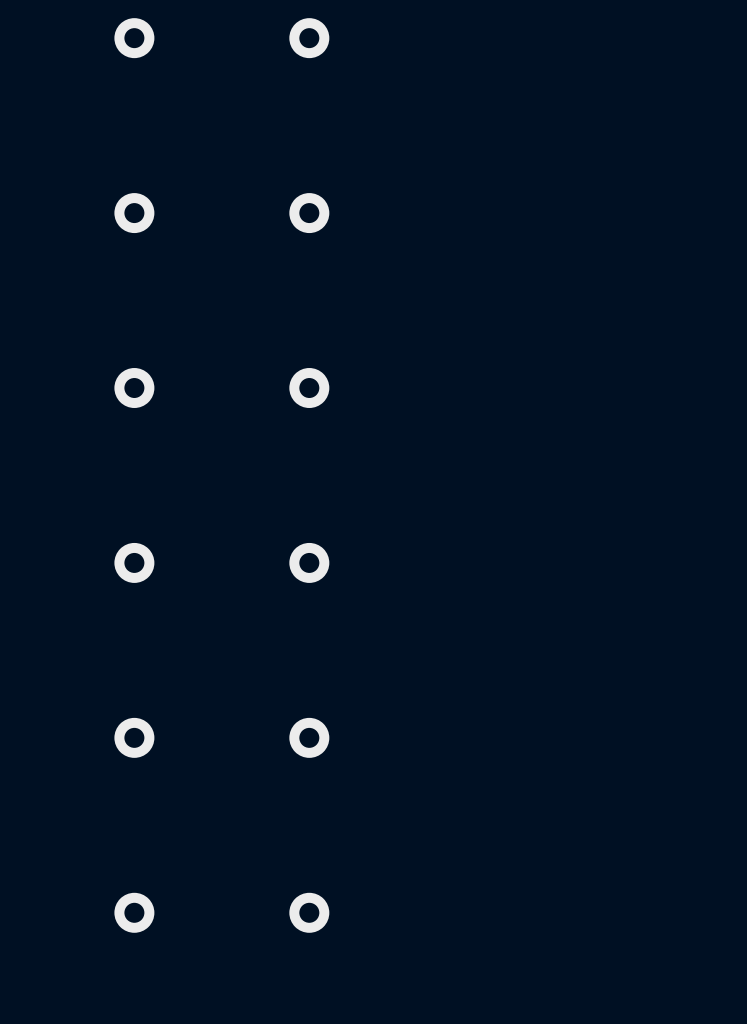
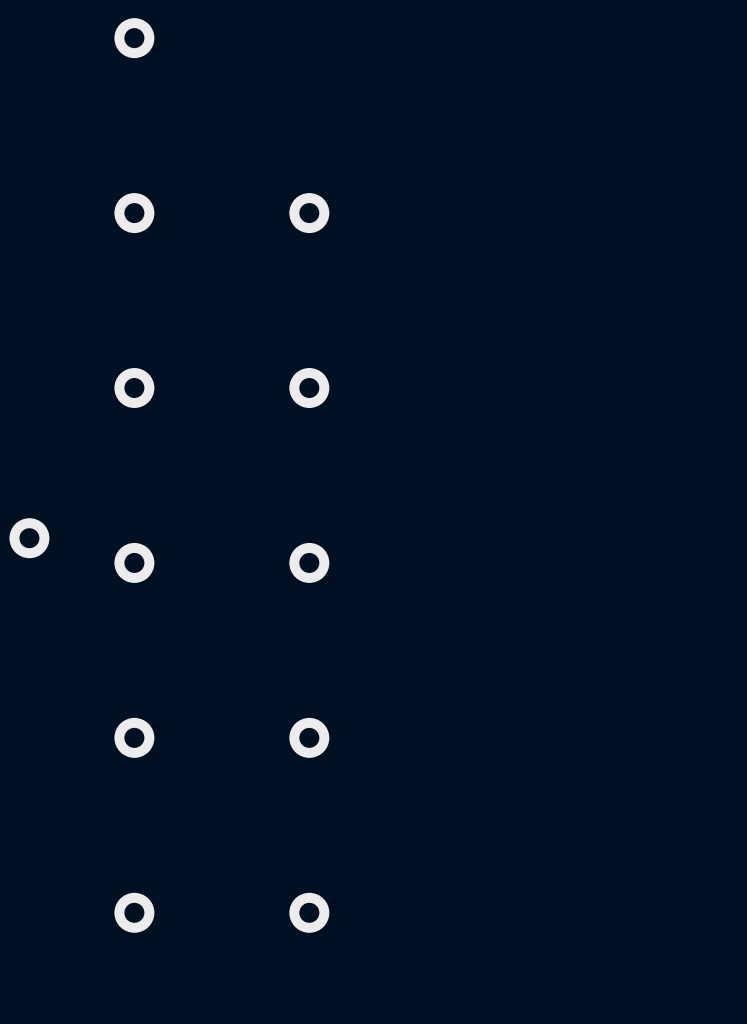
via: (309, 38) -> none
via: none -> (29, 538)

